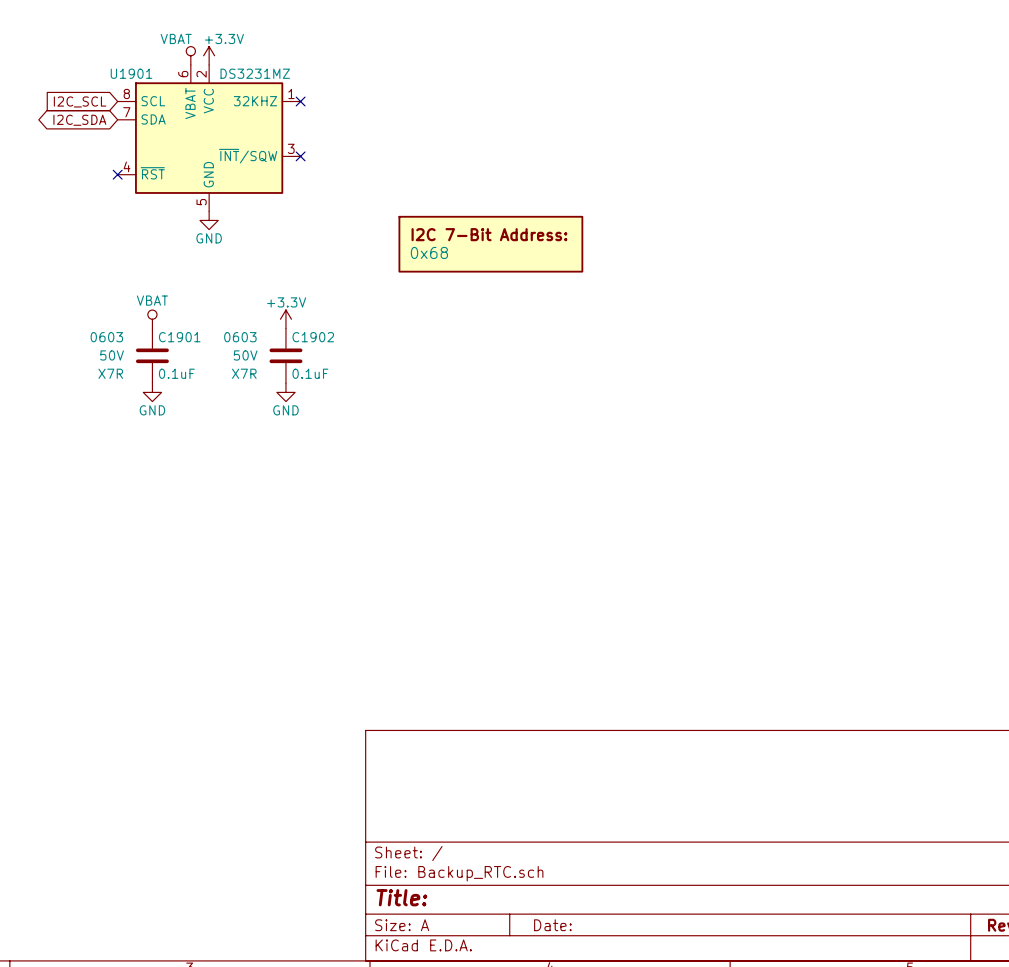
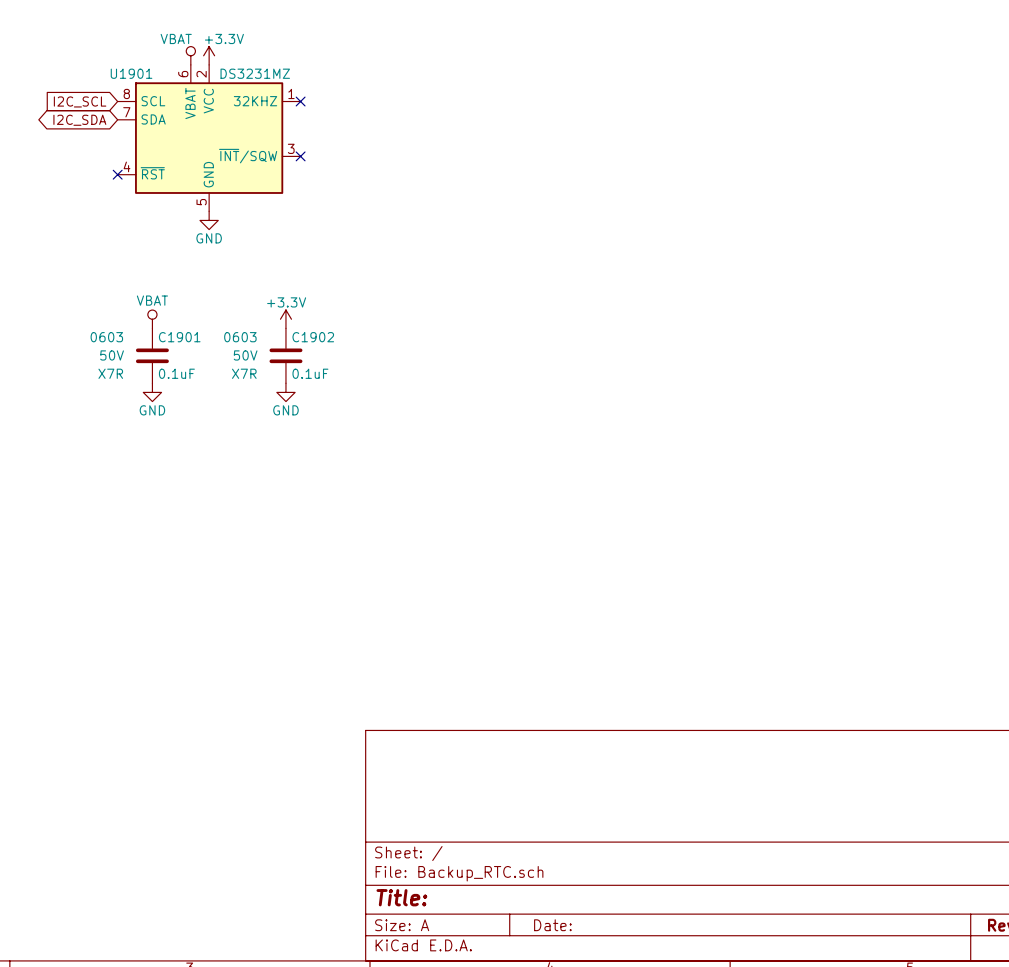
part: 0x68 (490, 244) -> none

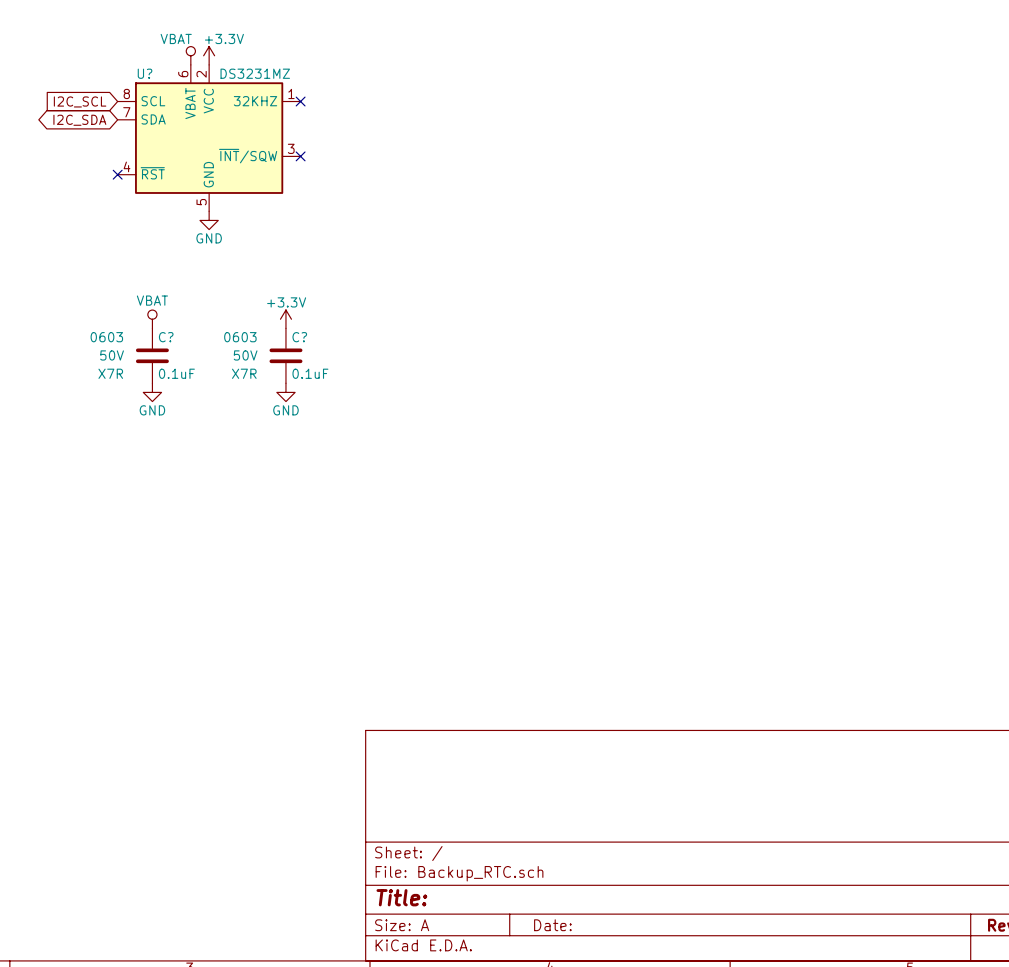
U1901 name: U1901 (131, 73) -> U? (145, 73)
C1901 name: C1901 (179, 337) -> C? (166, 337)
C1902 name: C1902 (313, 337) -> C? (299, 337)

